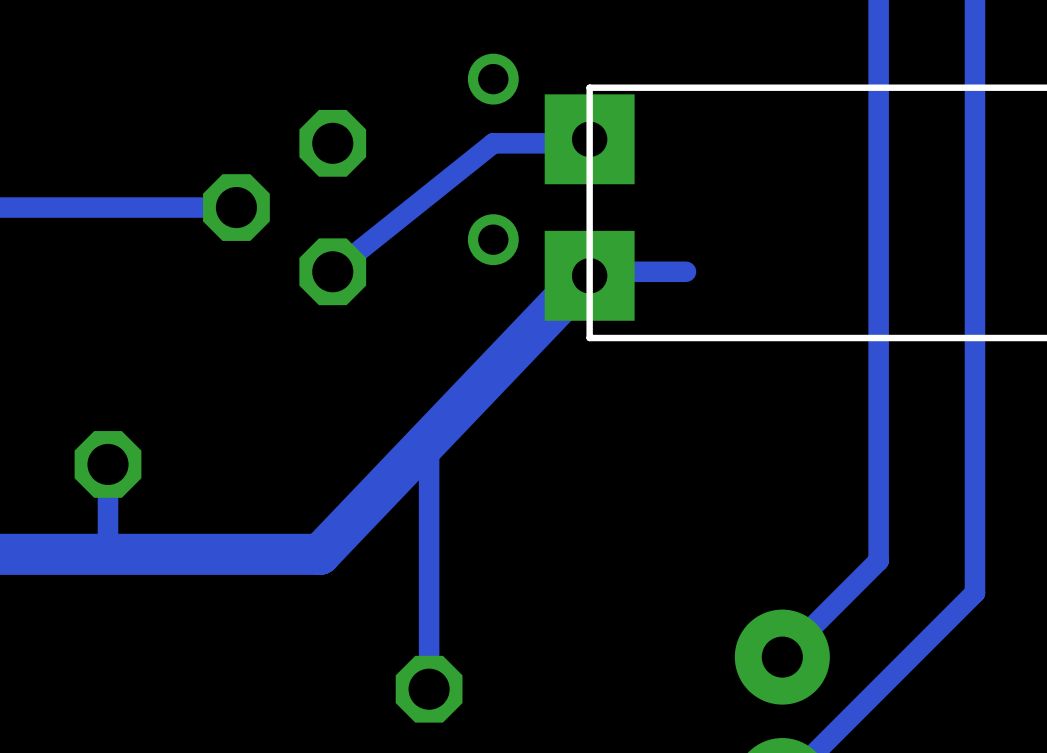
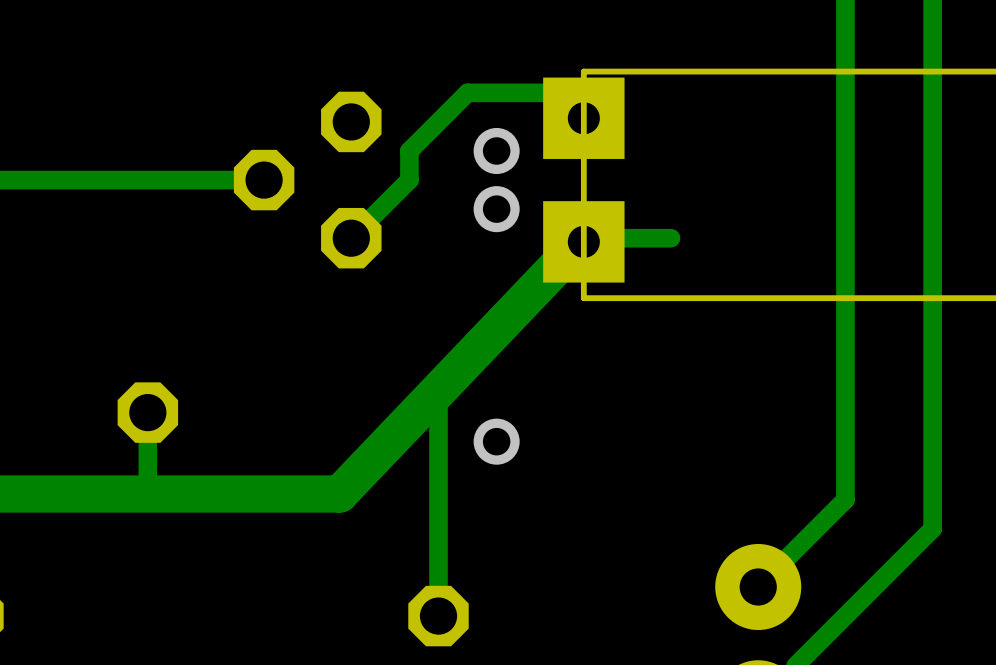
via: (493, 79) -> none
track: (589, 143) (493, 143) (332, 271) -> (583, 121) (554, 92) (467, 92) (409, 151) (409, 180) (351, 238)
via: none -> (496, 151)
via: none -> (496, 441)

